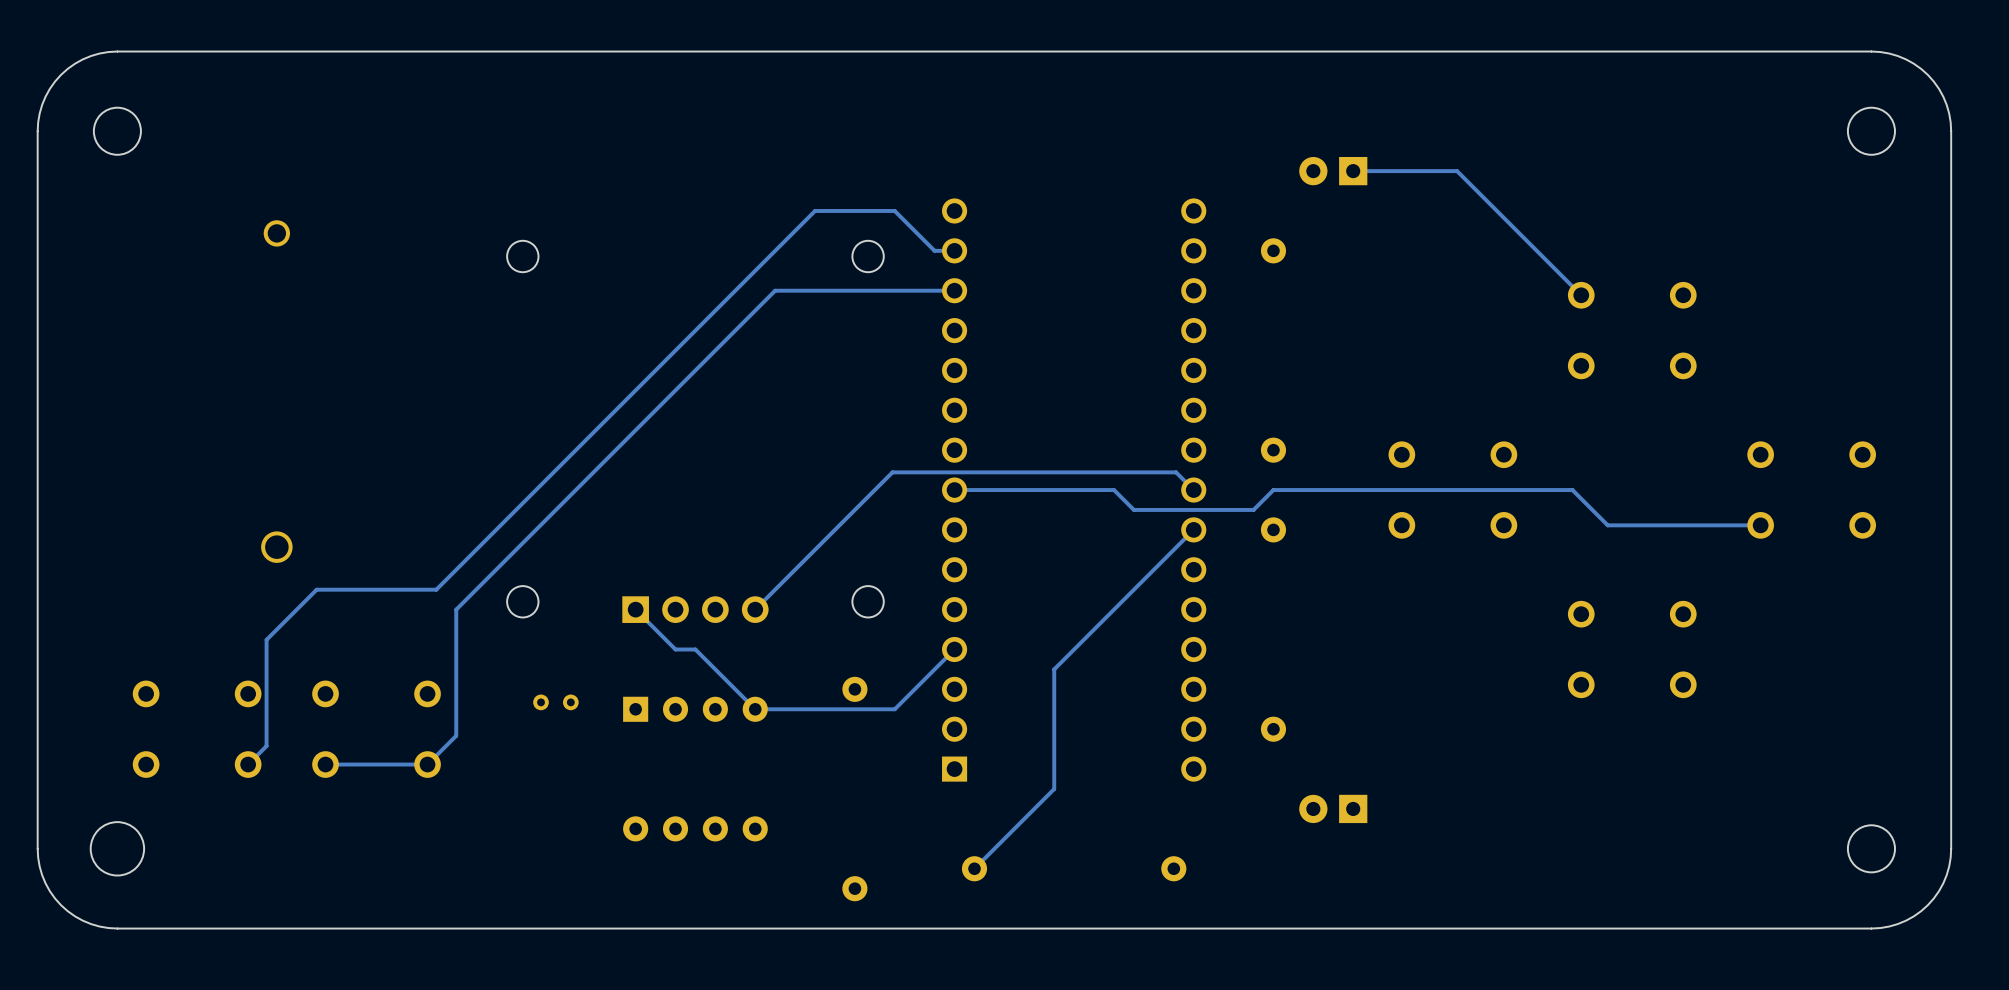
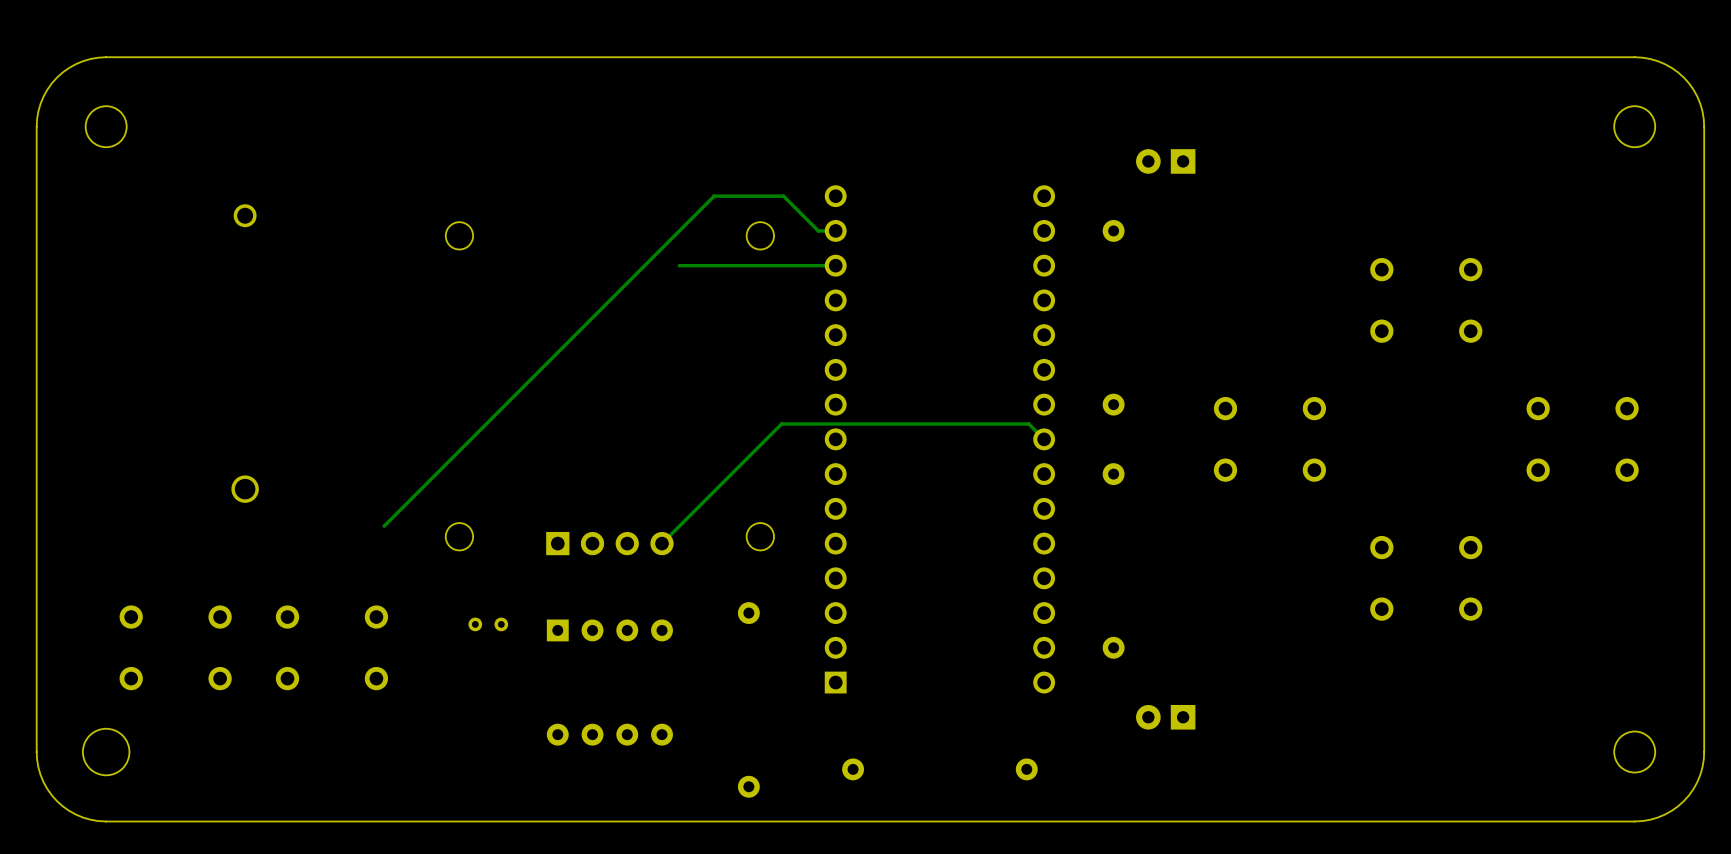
track: (1353, 171) (1457, 171) (1581, 295) -> none
track: (775, 290) (456, 609) (456, 735) (427, 764) (325, 764) -> none
track: (954, 490) (1114, 490) (1133, 509) (1253, 509) (1273, 490) (1572, 490) (1607, 525) (1760, 525) -> none
track: (1193, 529) (1054, 669) (1054, 789) (974, 868) -> none
track: (436, 589) (316, 589) (266, 639) (266, 746) (248, 764) -> none
track: (635, 609) (675, 649) (695, 649) (755, 709) (894, 709) (954, 649) -> none

